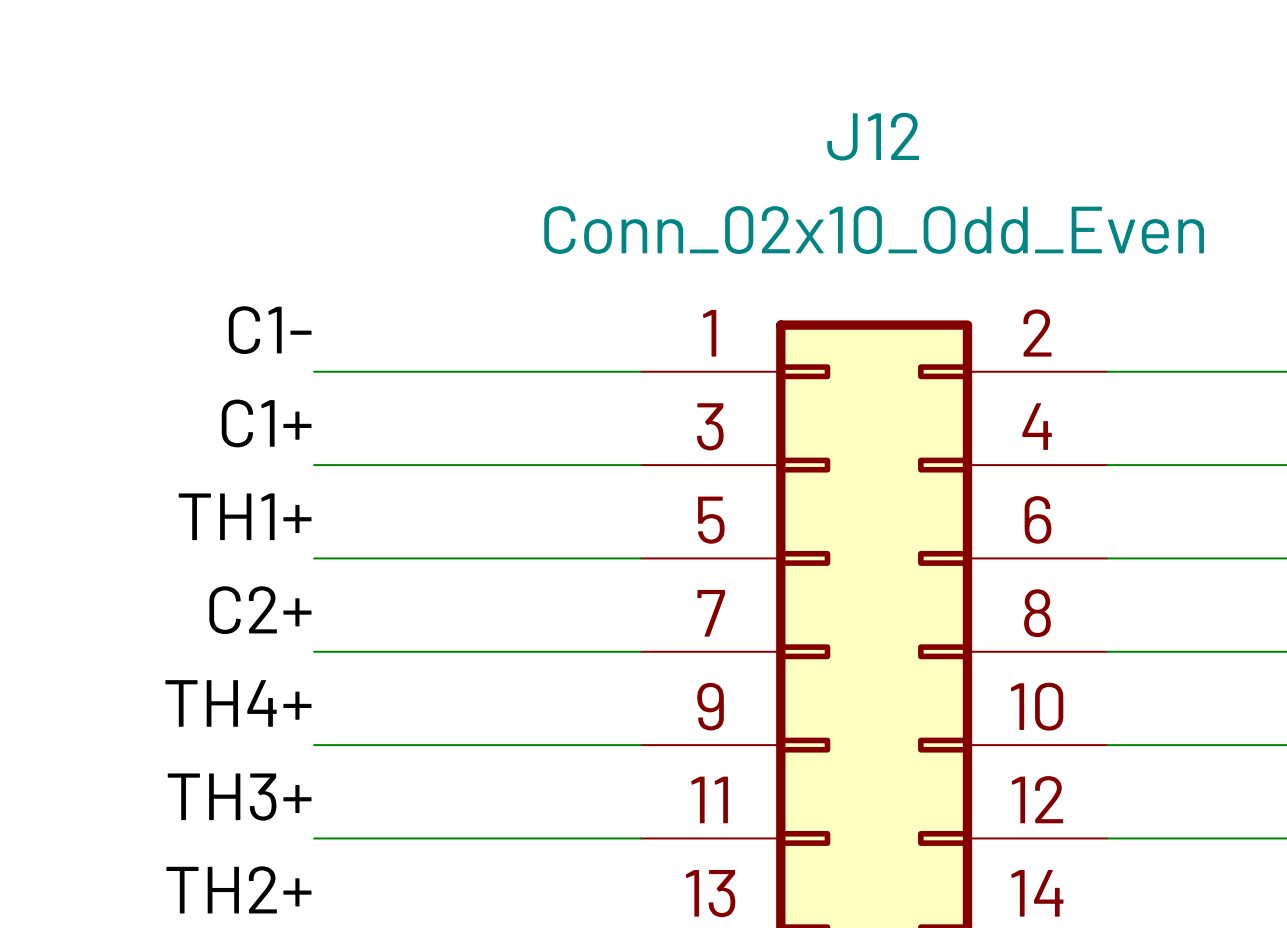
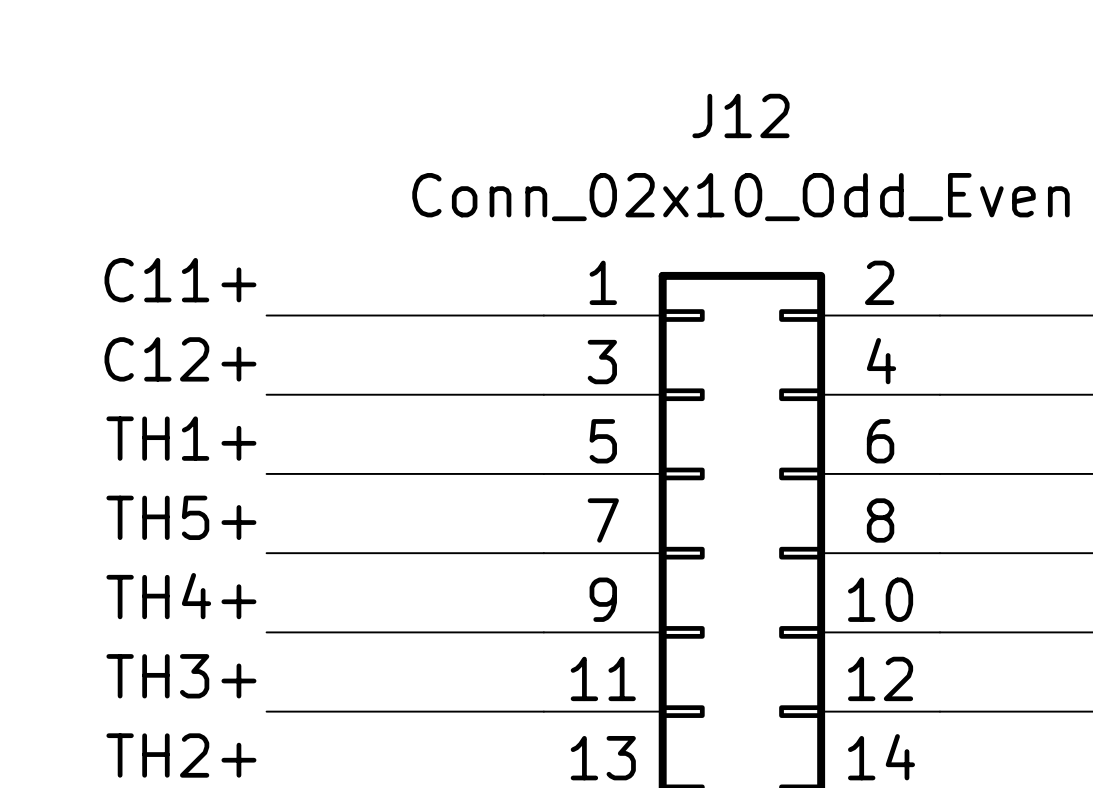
label: C1- (270, 330) -> C11+ (180, 280)
label: C1+ (266, 423) -> C12+ (180, 359)
label: C2+ (260, 610) -> TH5+ (181, 517)

